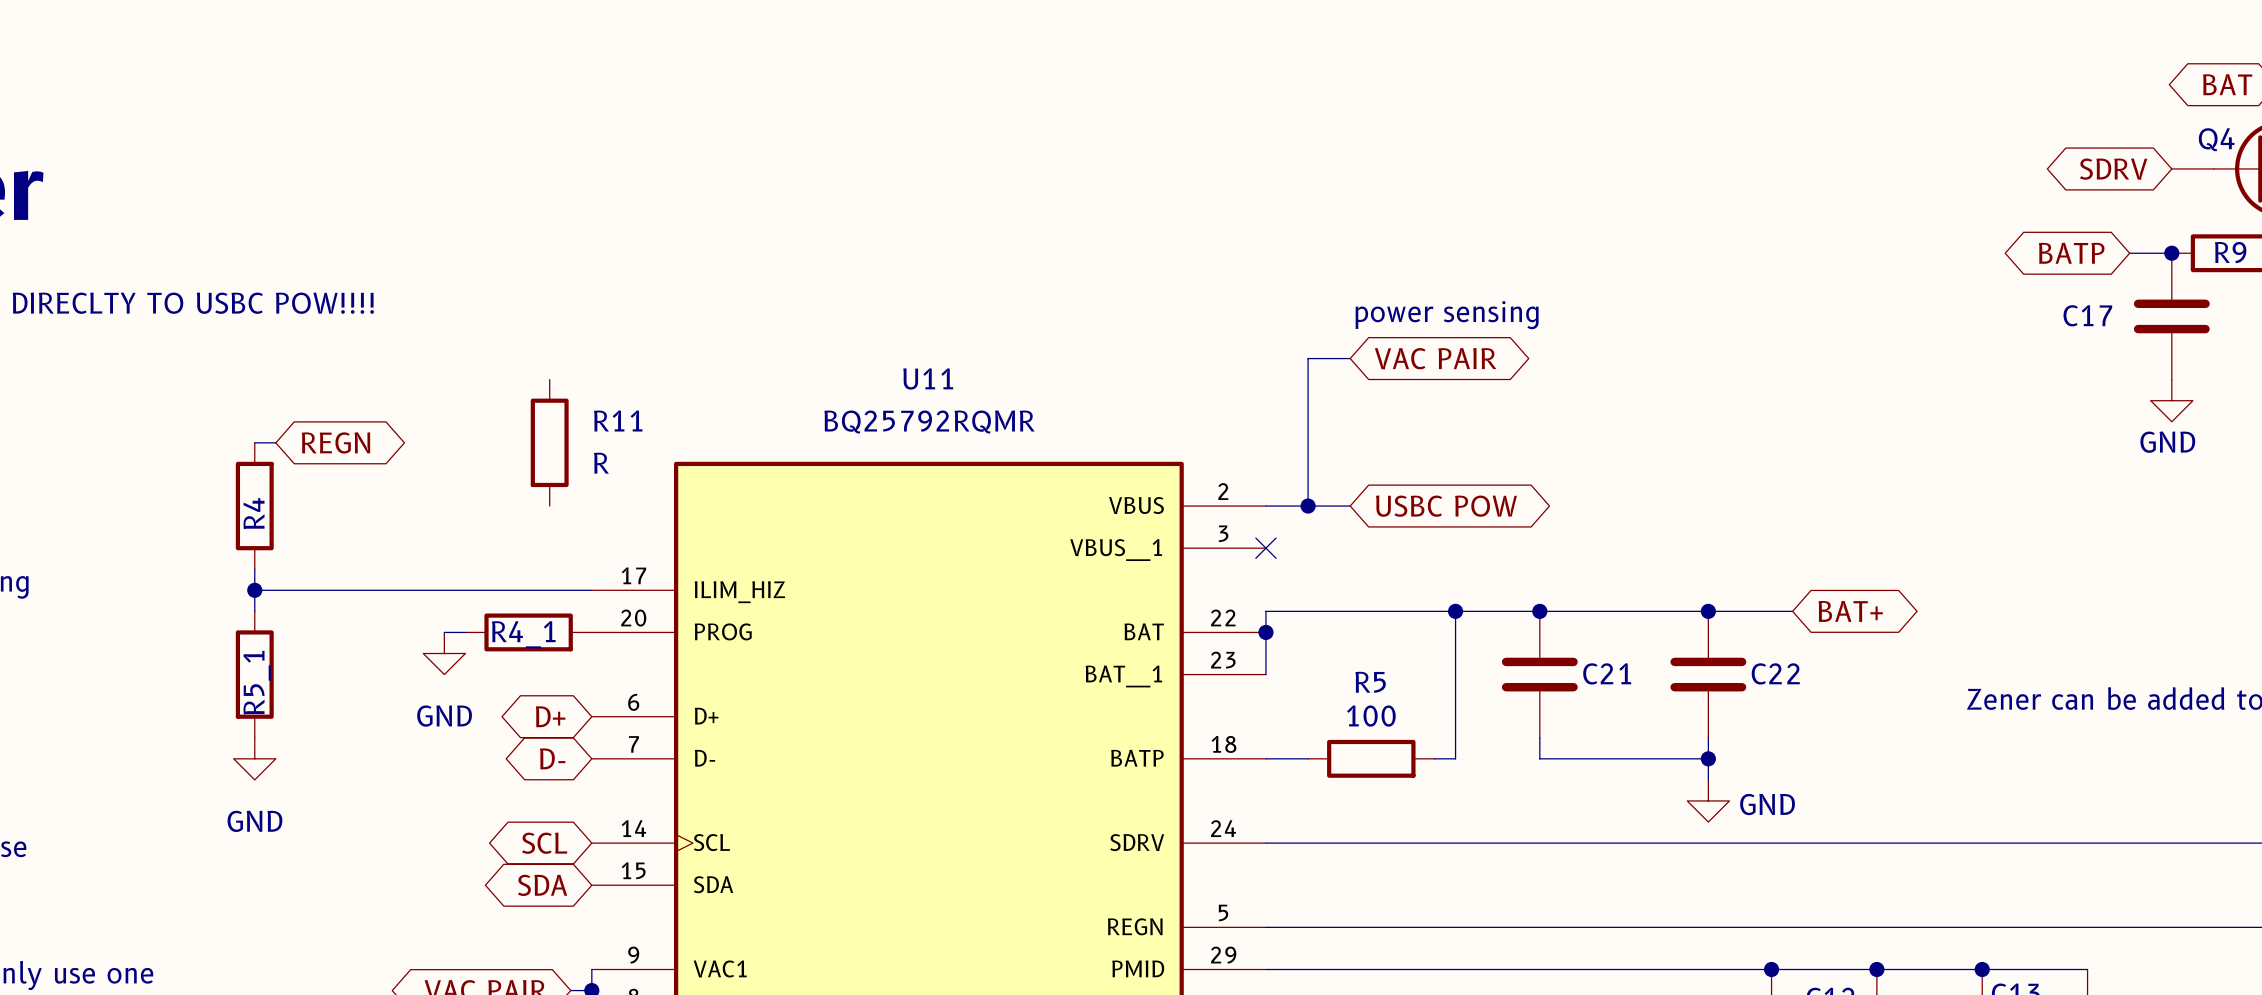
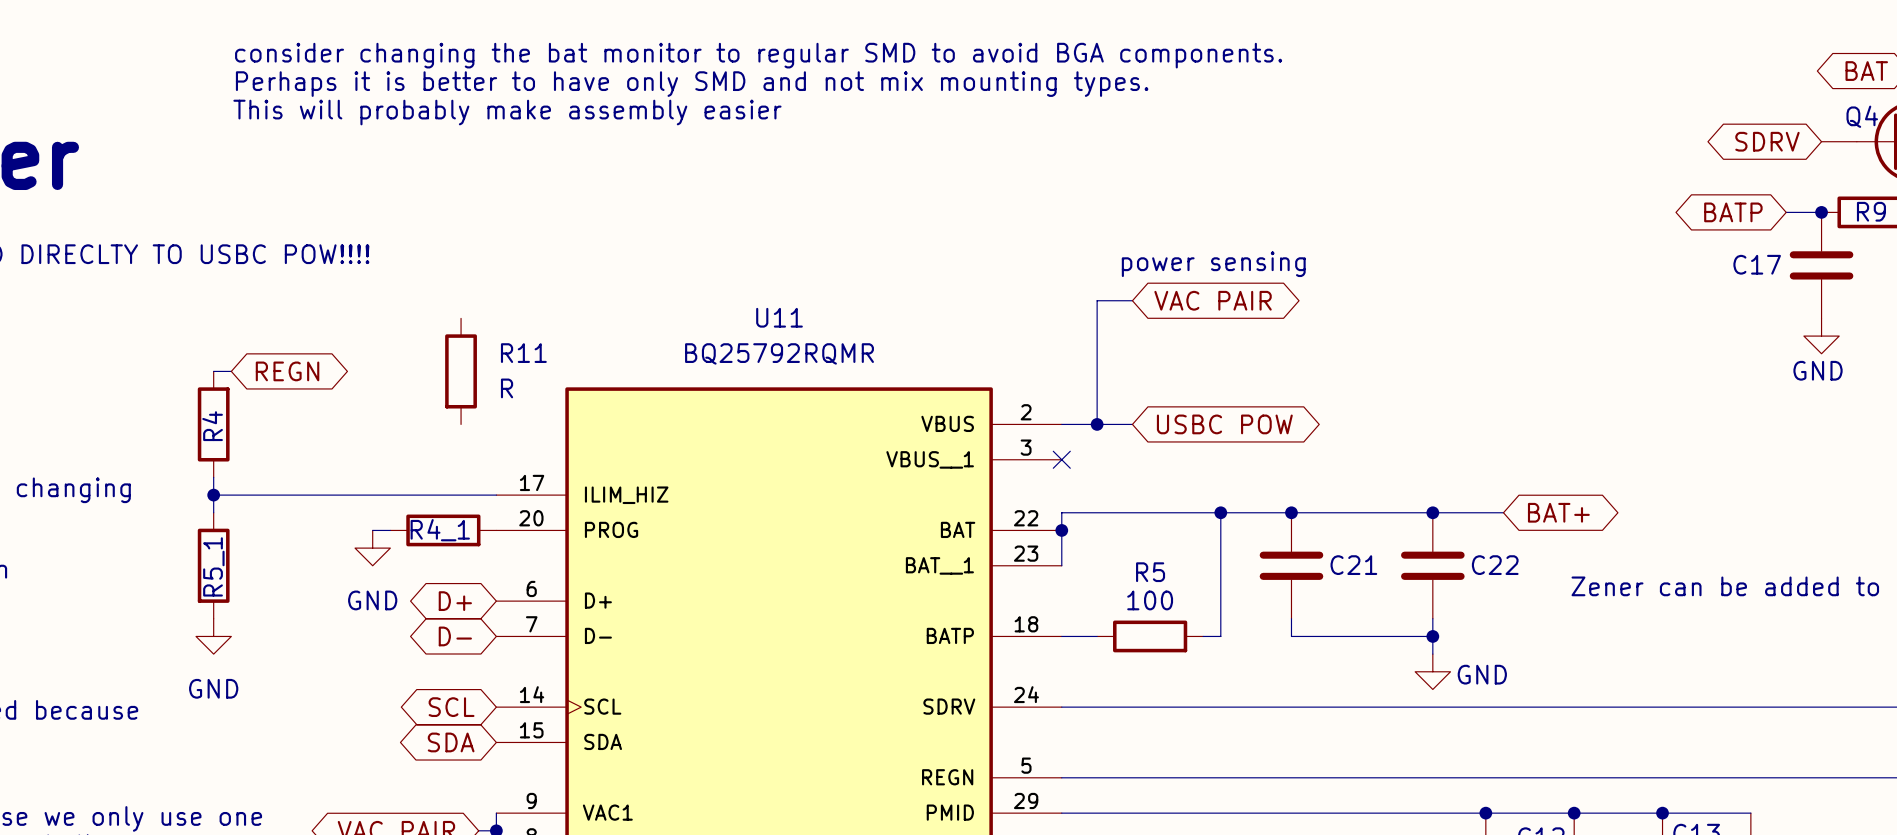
text: none -> consider changing the bat monitor to regular SMD to avoid BGA components. (758, 55)
text: none -> Perhaps it is better to have only SMD and not mix mounting types. (692, 84)
text: none -> This will probably make assembly easier (507, 112)

